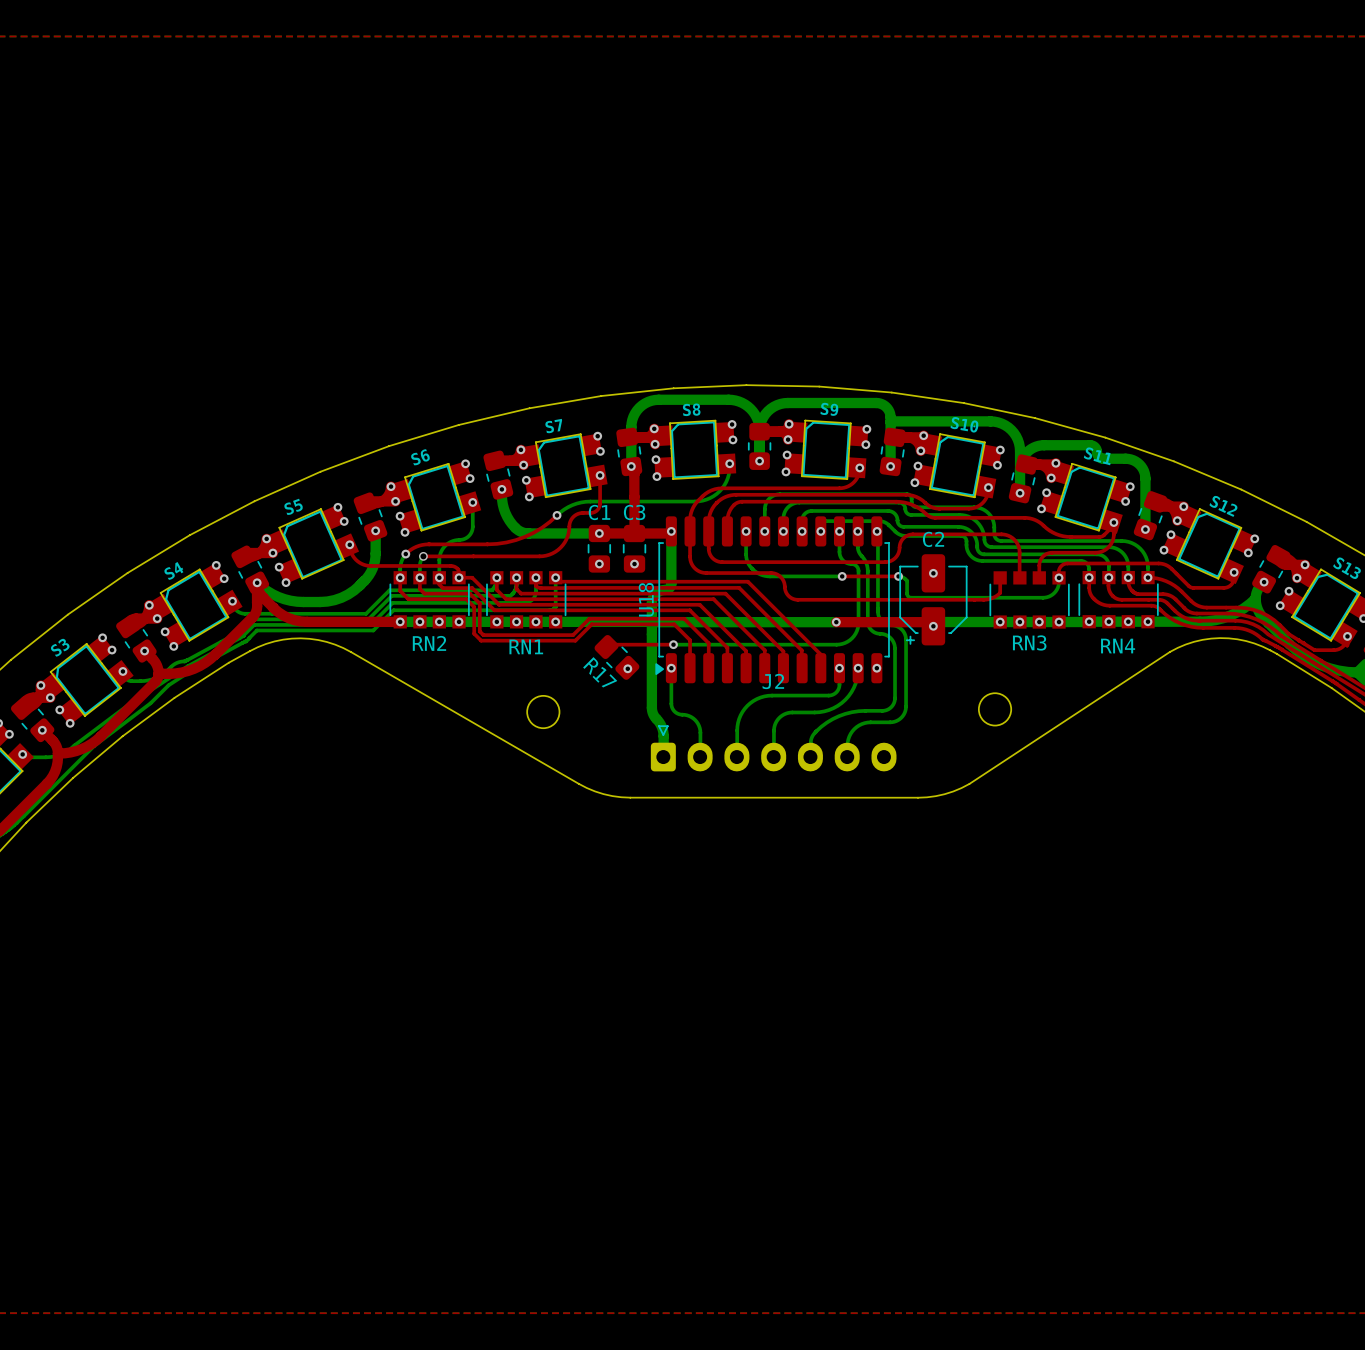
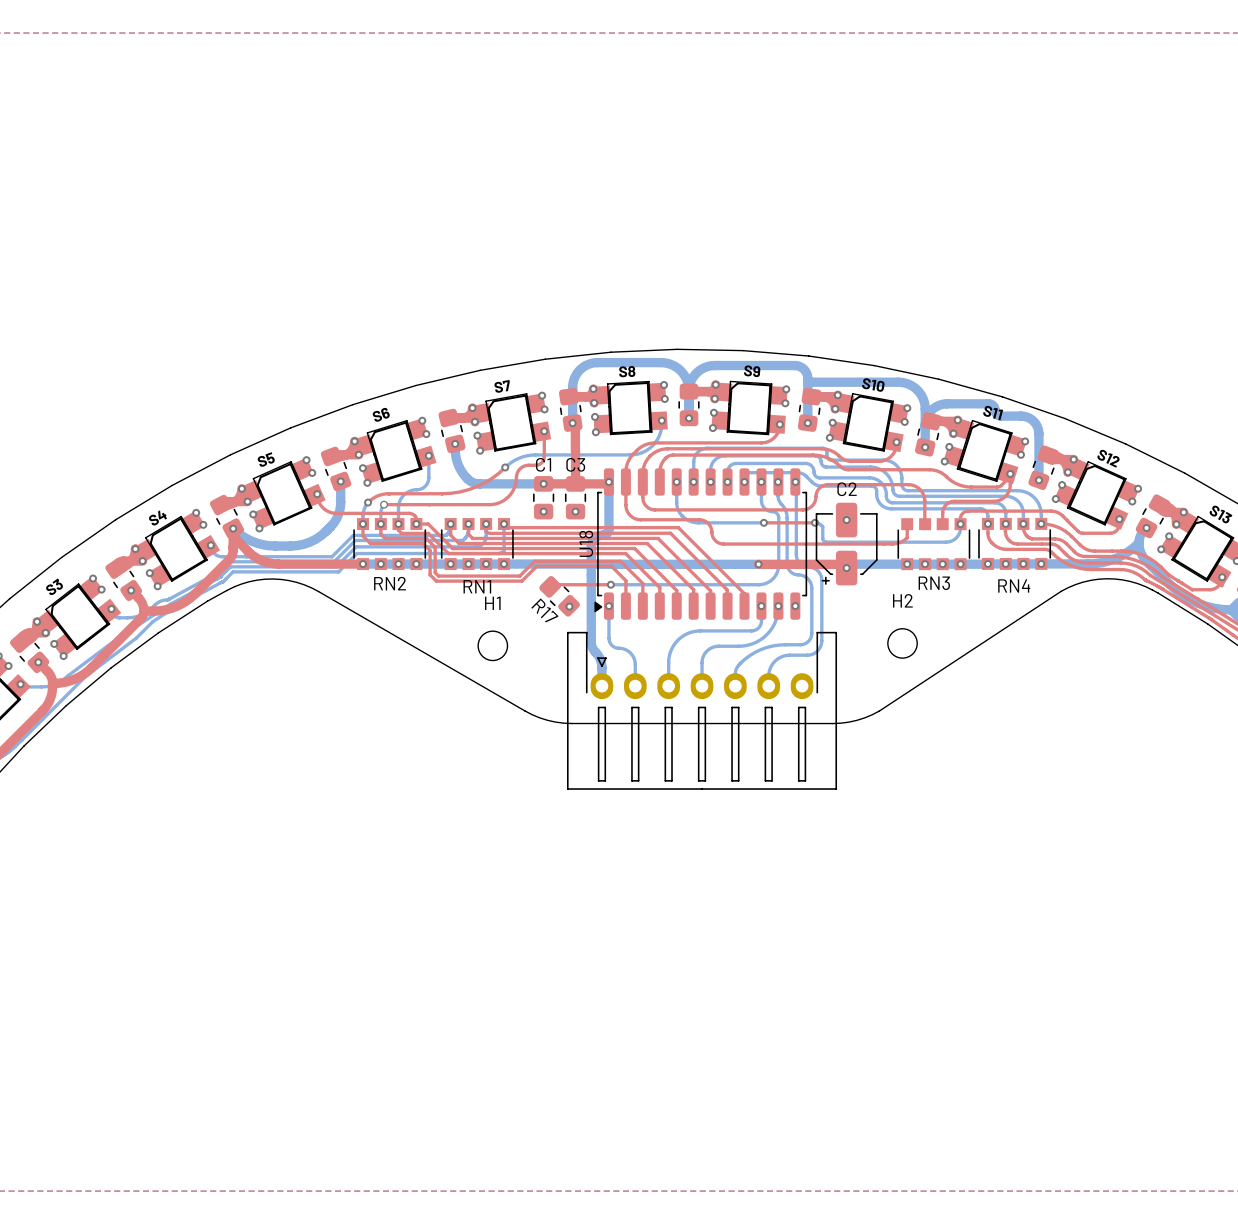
H2 name: none -> H2 (902, 600)
H1 name: none -> H1 (492, 603)
J2: (773, 748) -> none
part: none -> (702, 710)

